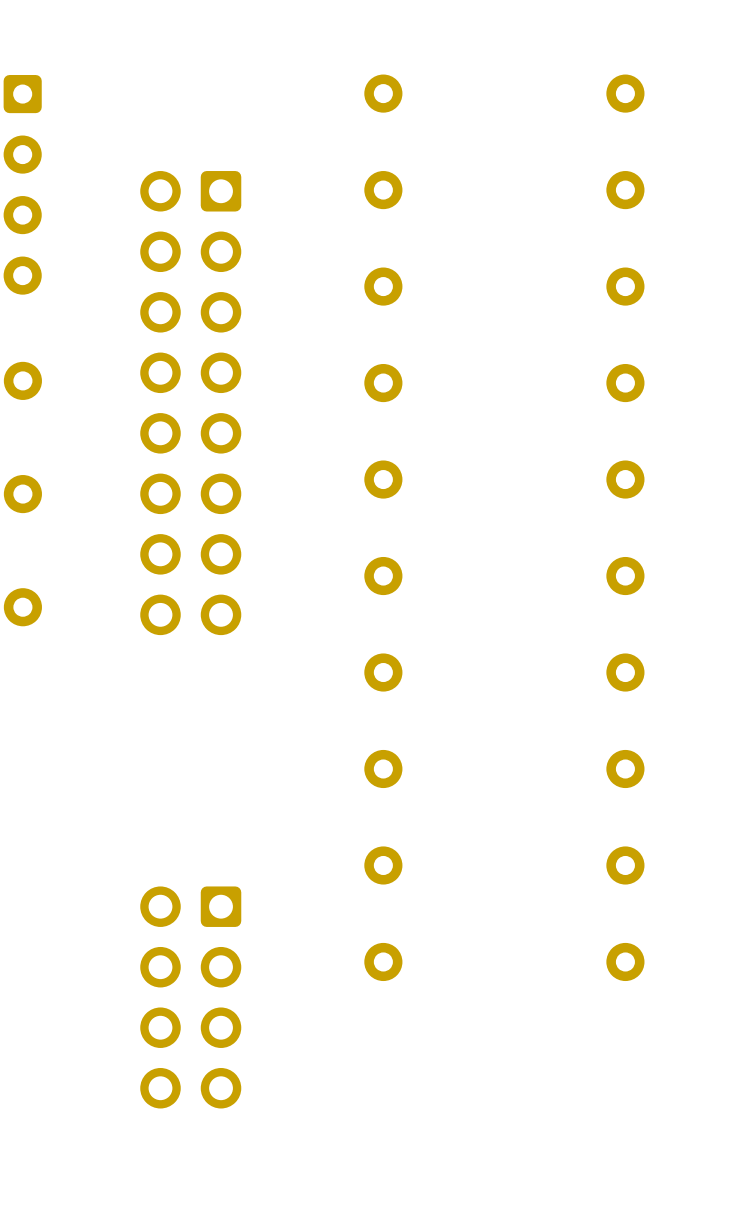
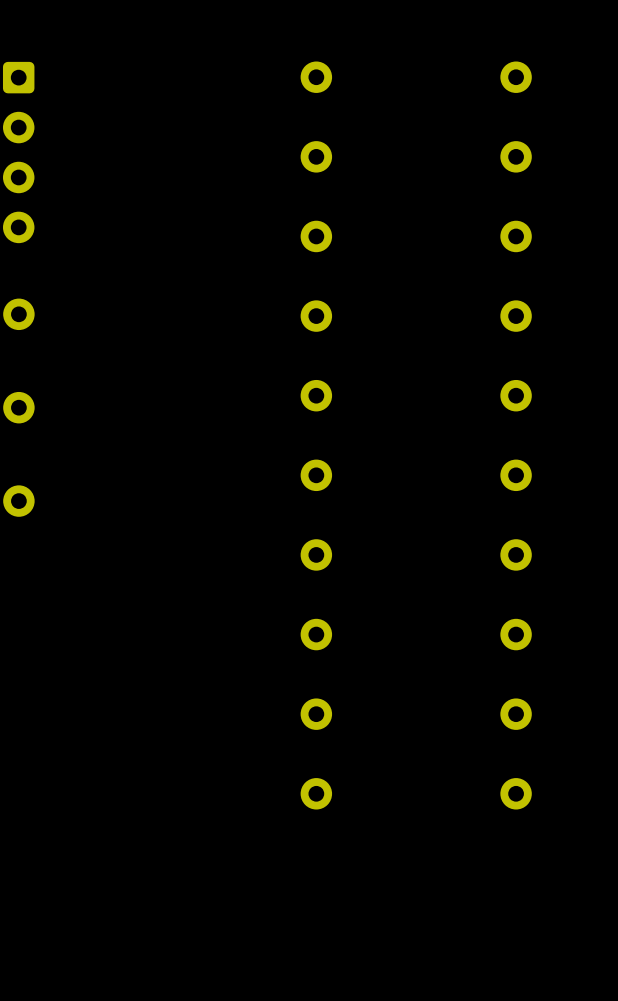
part: (190, 403) -> none
part: (190, 997) -> none

